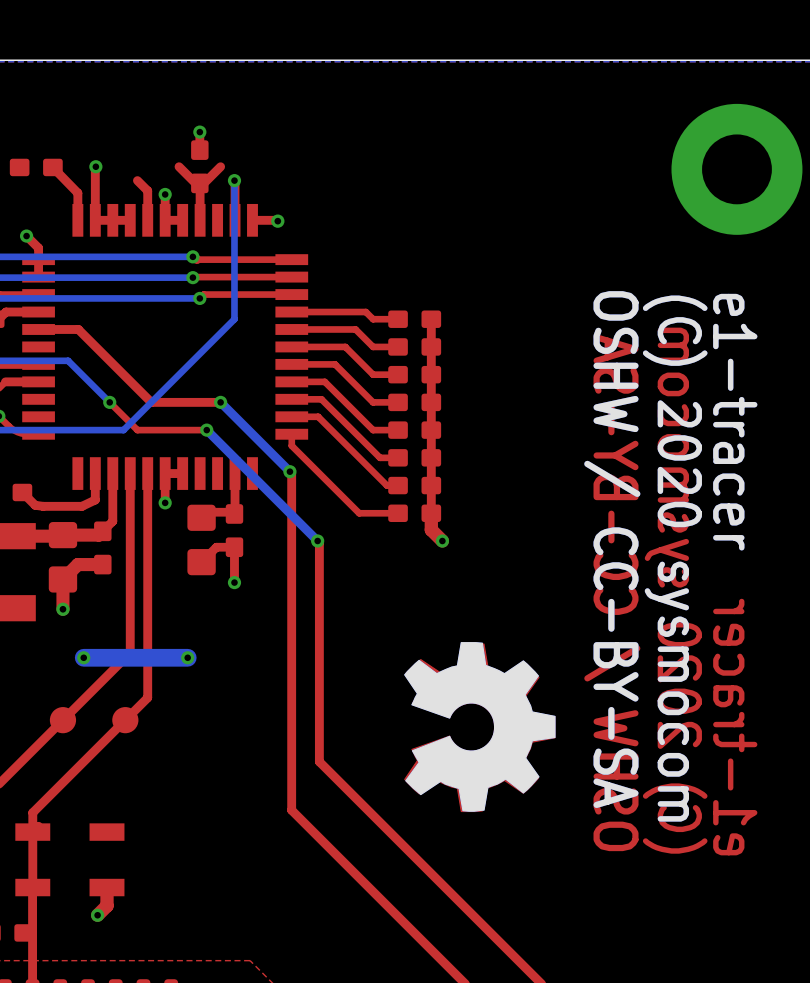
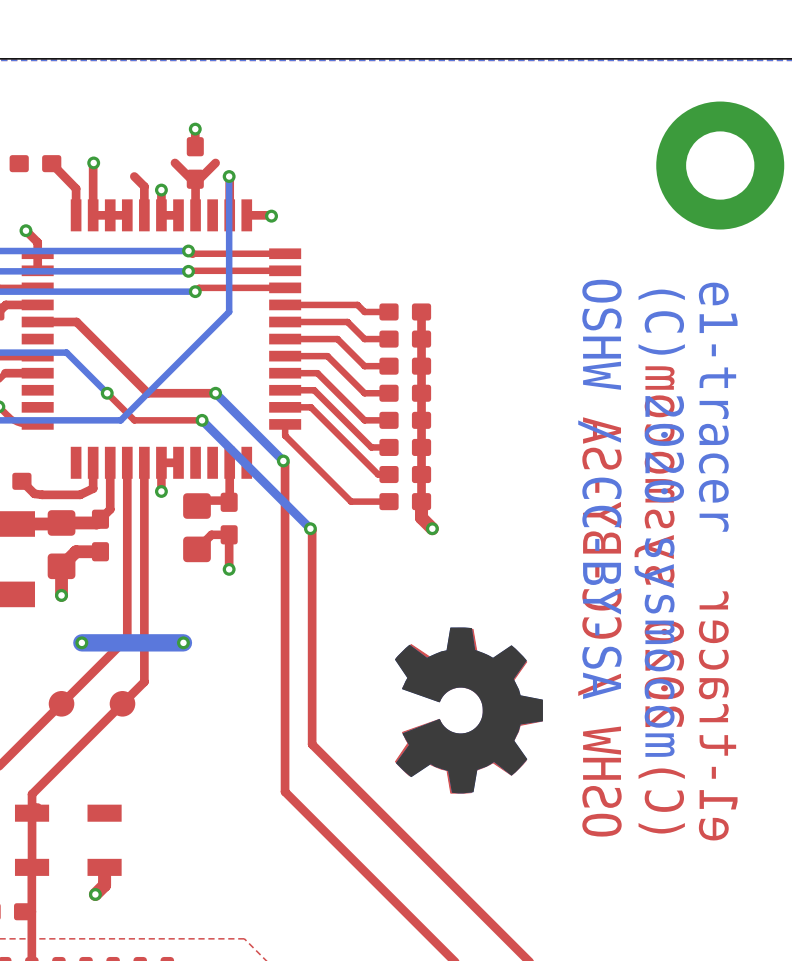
text: e1-tracer (735, 422) -> none
text: OSHW / CC-BY-SA (612, 549) -> none
text: (C) 2020 sysmocom (675, 558) -> none

